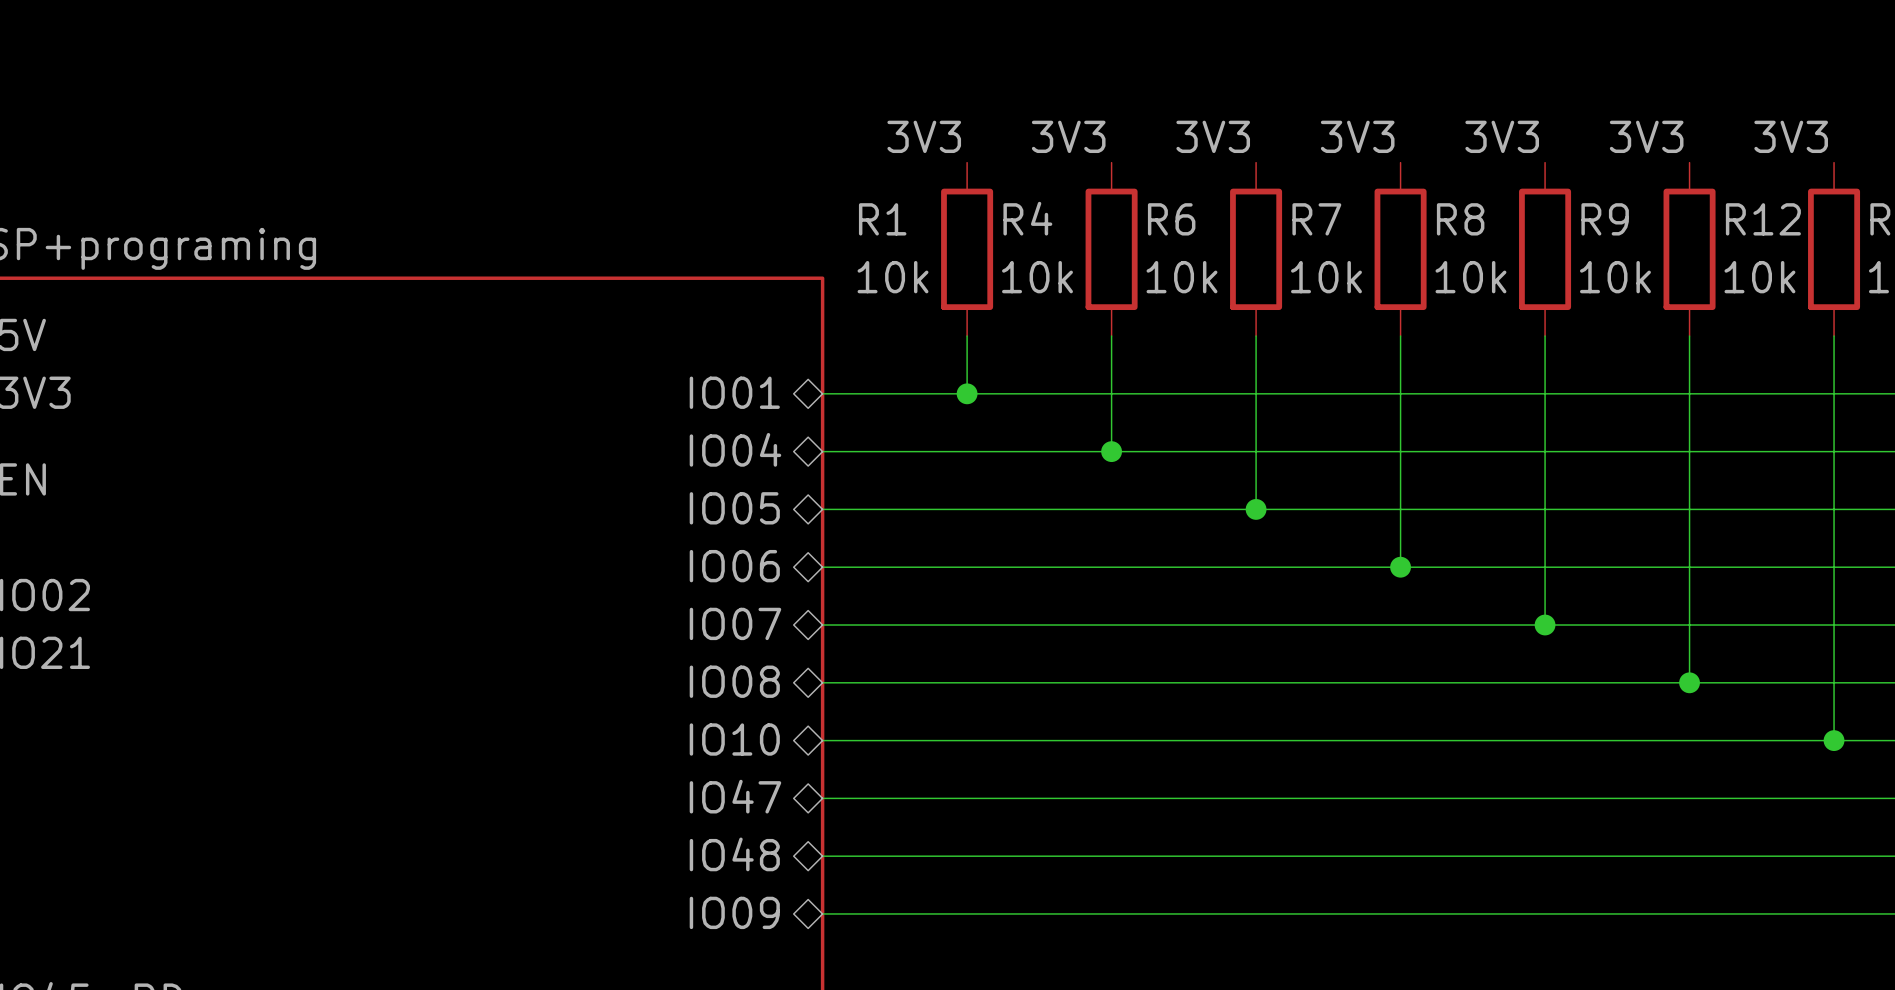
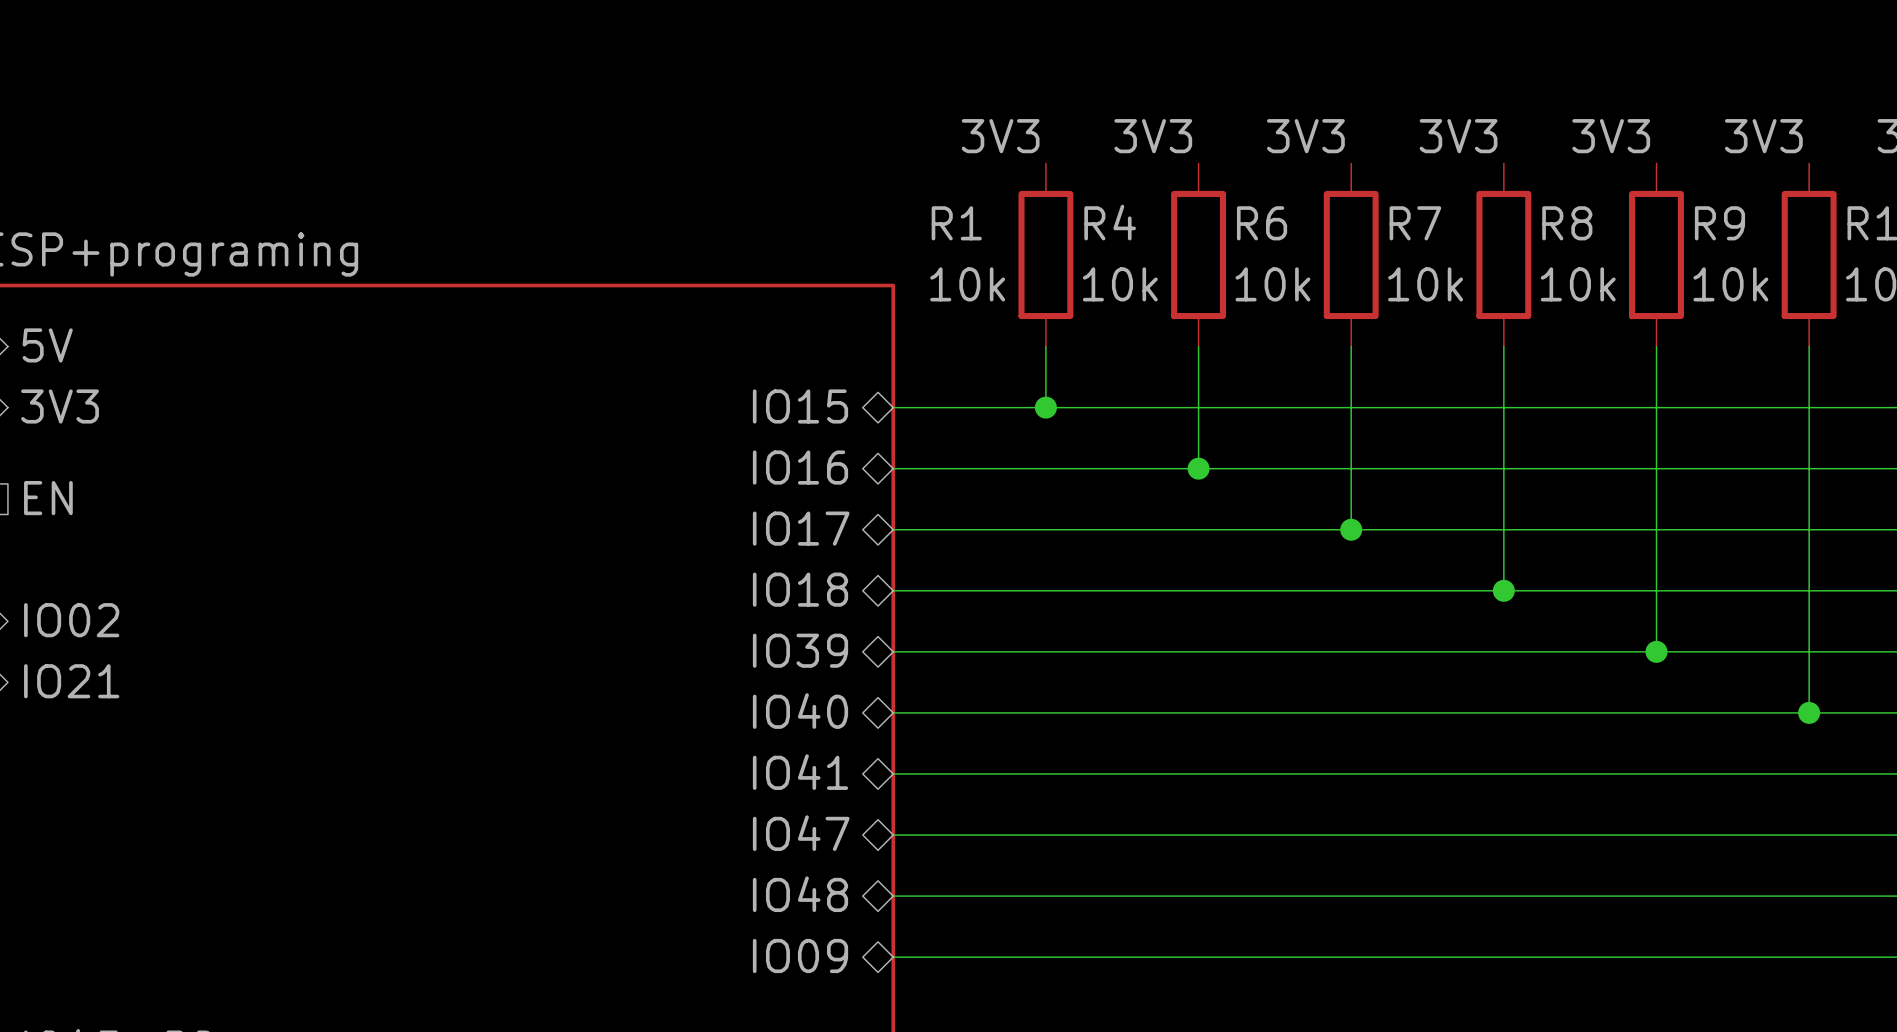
sheet pin: IO01 (734, 392) -> IO15 (800, 406)
sheet pin: IO04 (735, 449) -> IO16 (800, 467)
sheet pin: IO05 (734, 508) -> IO17 (801, 528)
sheet pin: IO06 (734, 566) -> IO18 (800, 589)
sheet pin: IO07 (735, 623) -> IO39 (800, 650)
sheet pin: IO08 (734, 681) -> IO40 (800, 711)
sheet pin: IO10 (734, 739) -> IO41 (800, 772)

